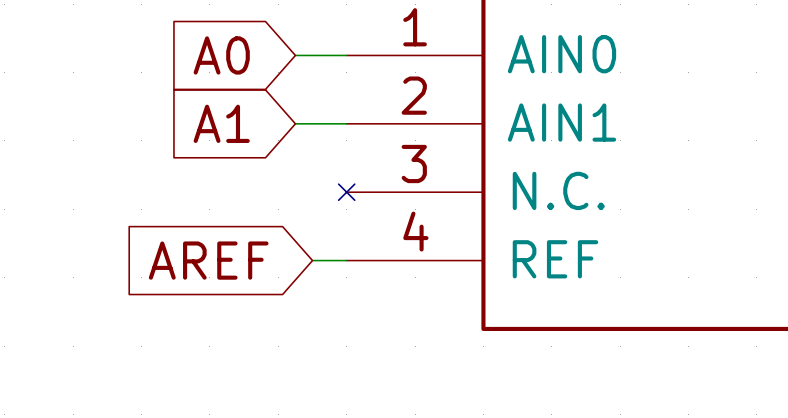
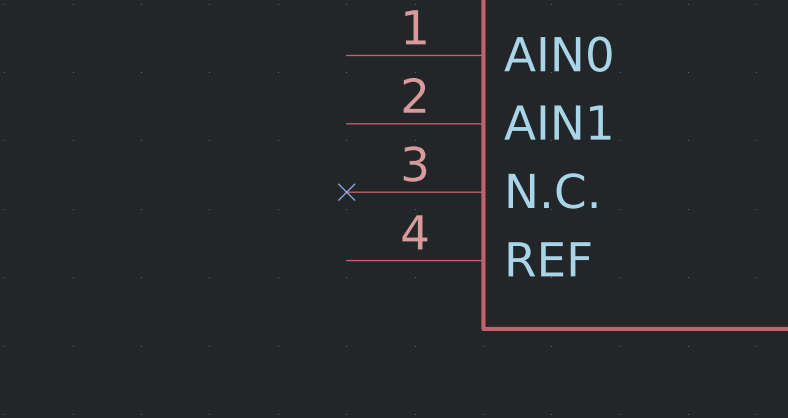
global label: A0 (221, 55) -> none
wire: (295, 55) (346, 55) -> none
global label: A1 (221, 123) -> none
wire: (295, 123) (346, 123) -> none
global label: AREF (208, 260) -> none
wire: (312, 260) (346, 260) -> none

